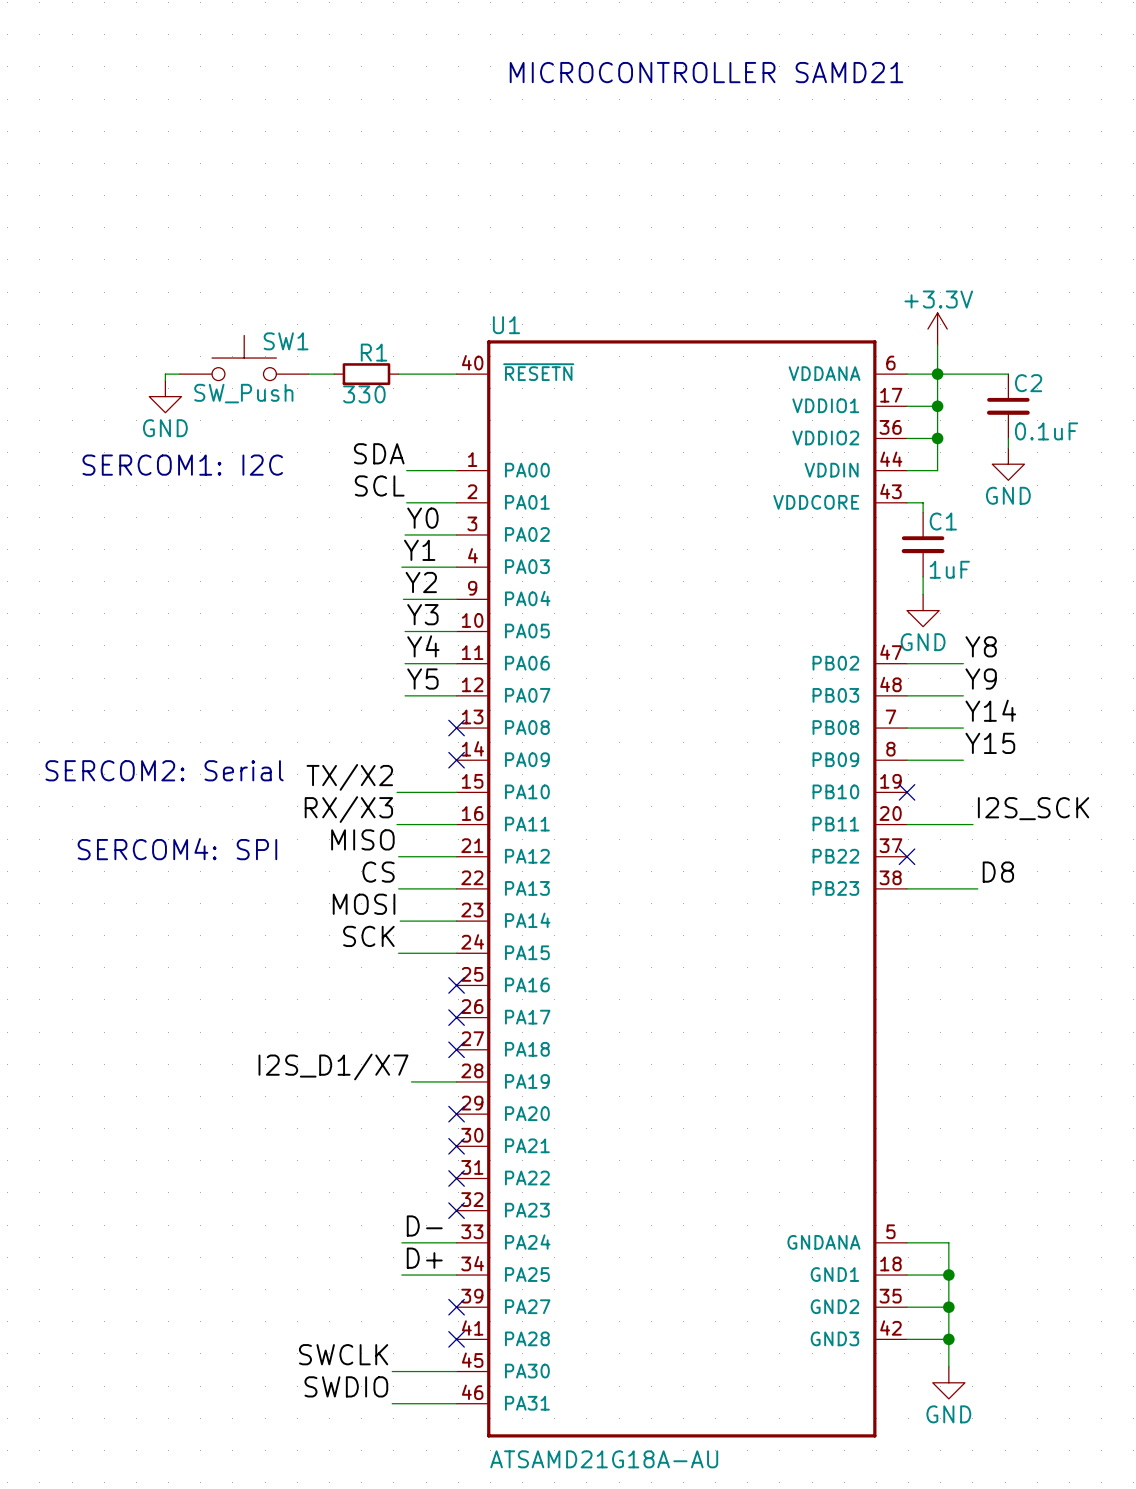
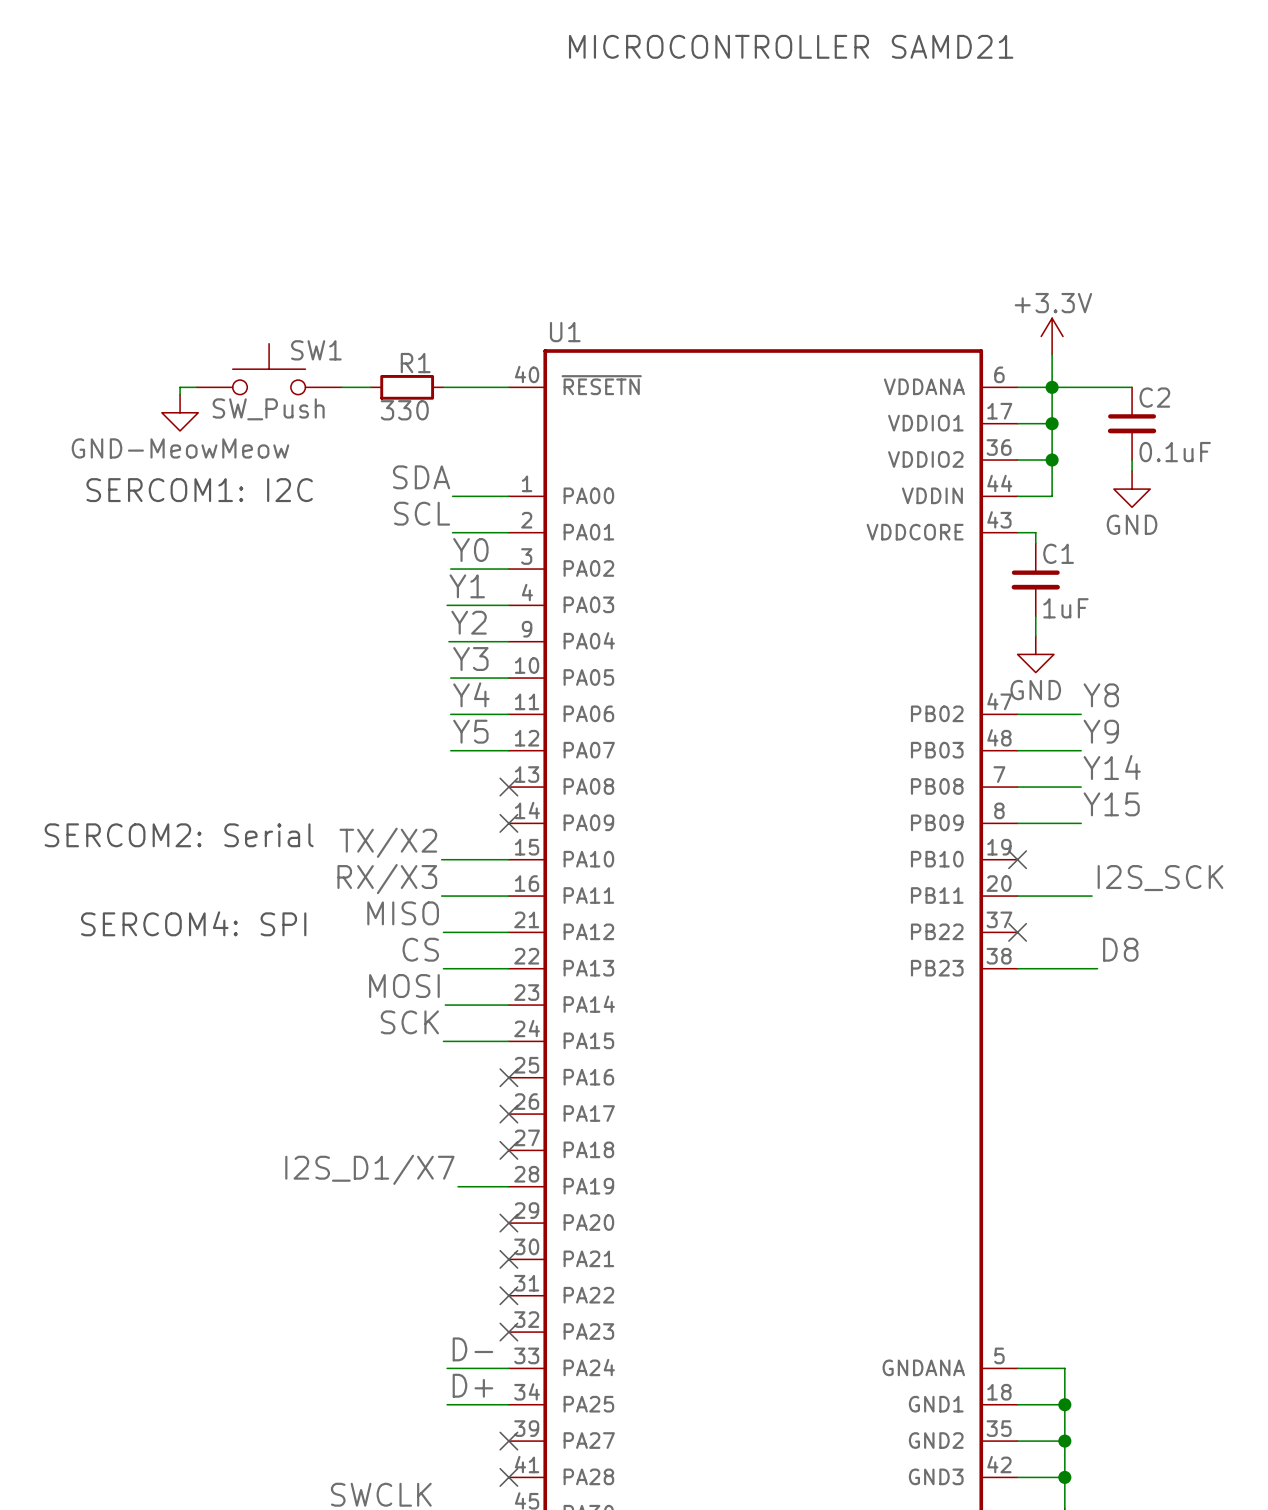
power symbol: GND (165, 396) -> GND-MeowMeow (180, 412)

